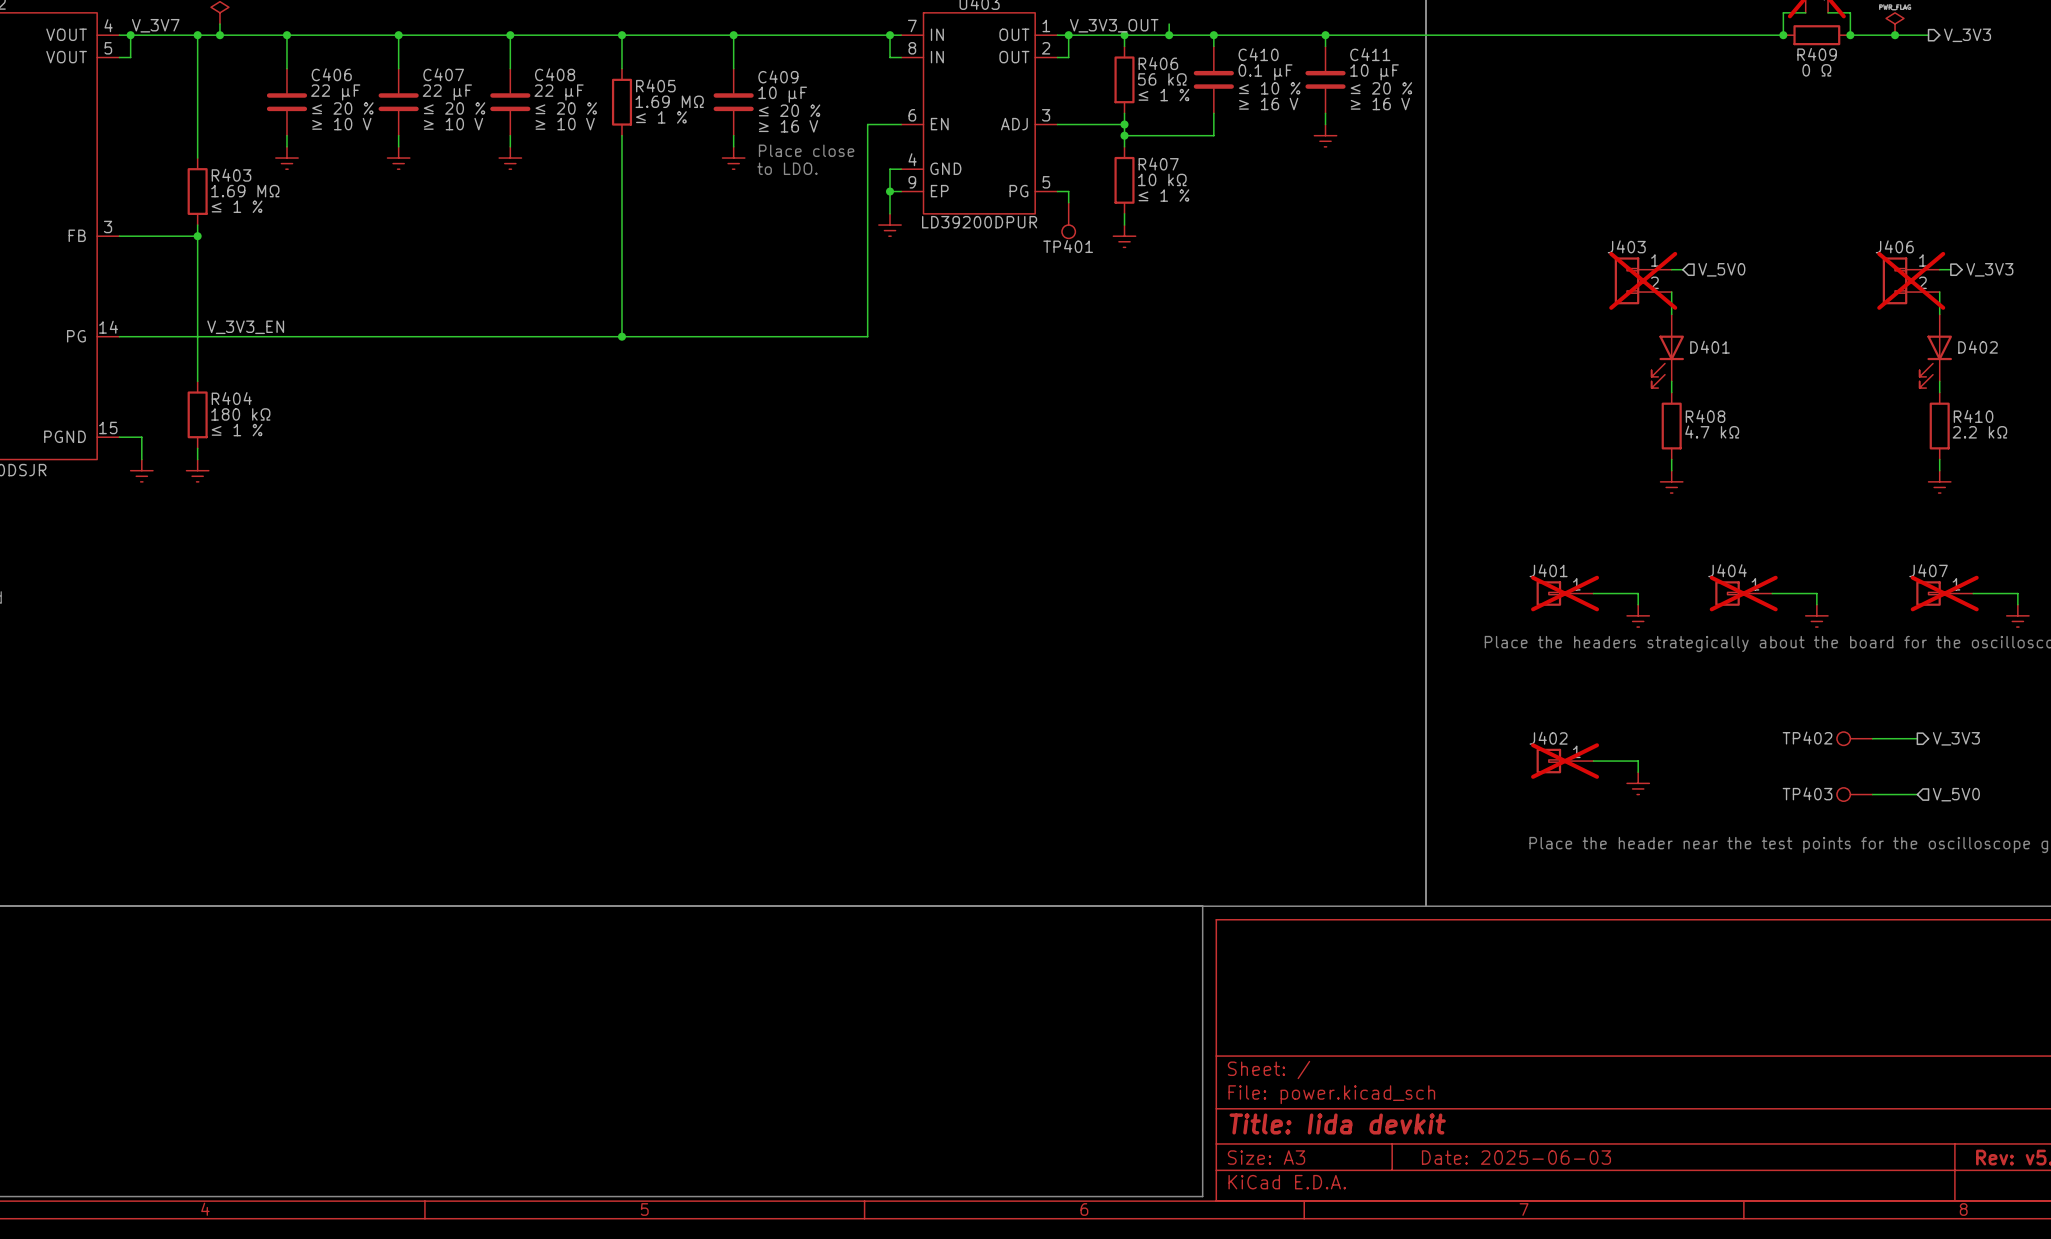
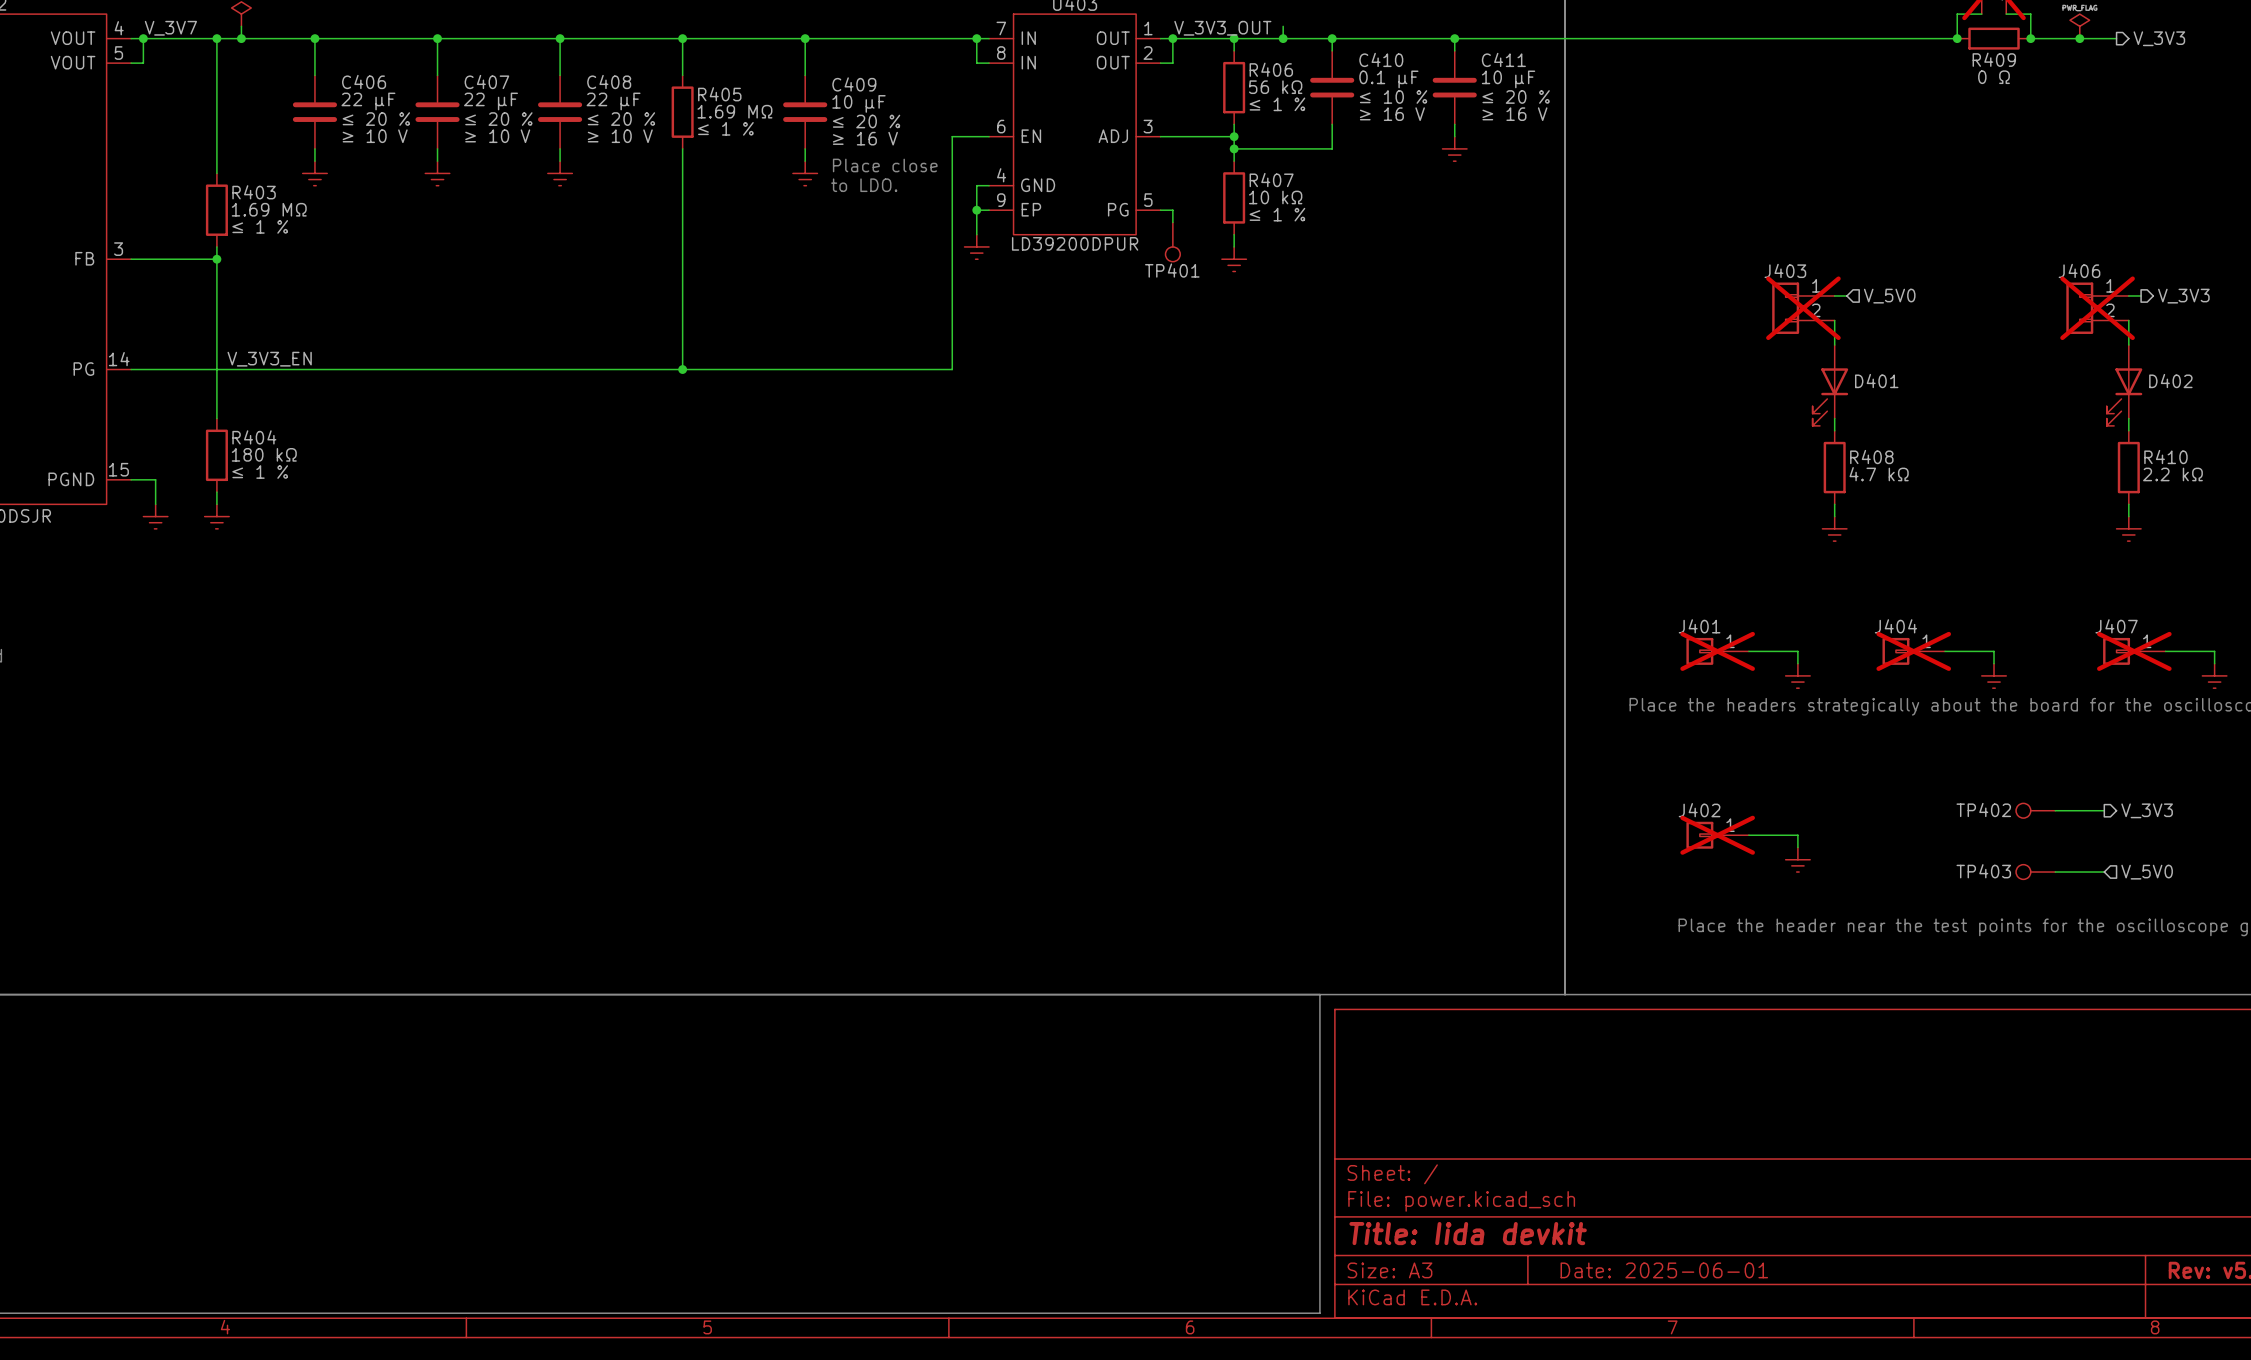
title block: Date: 2025-06-03 (1516, 1157) -> Date: 2025-06-01 (1664, 1270)

